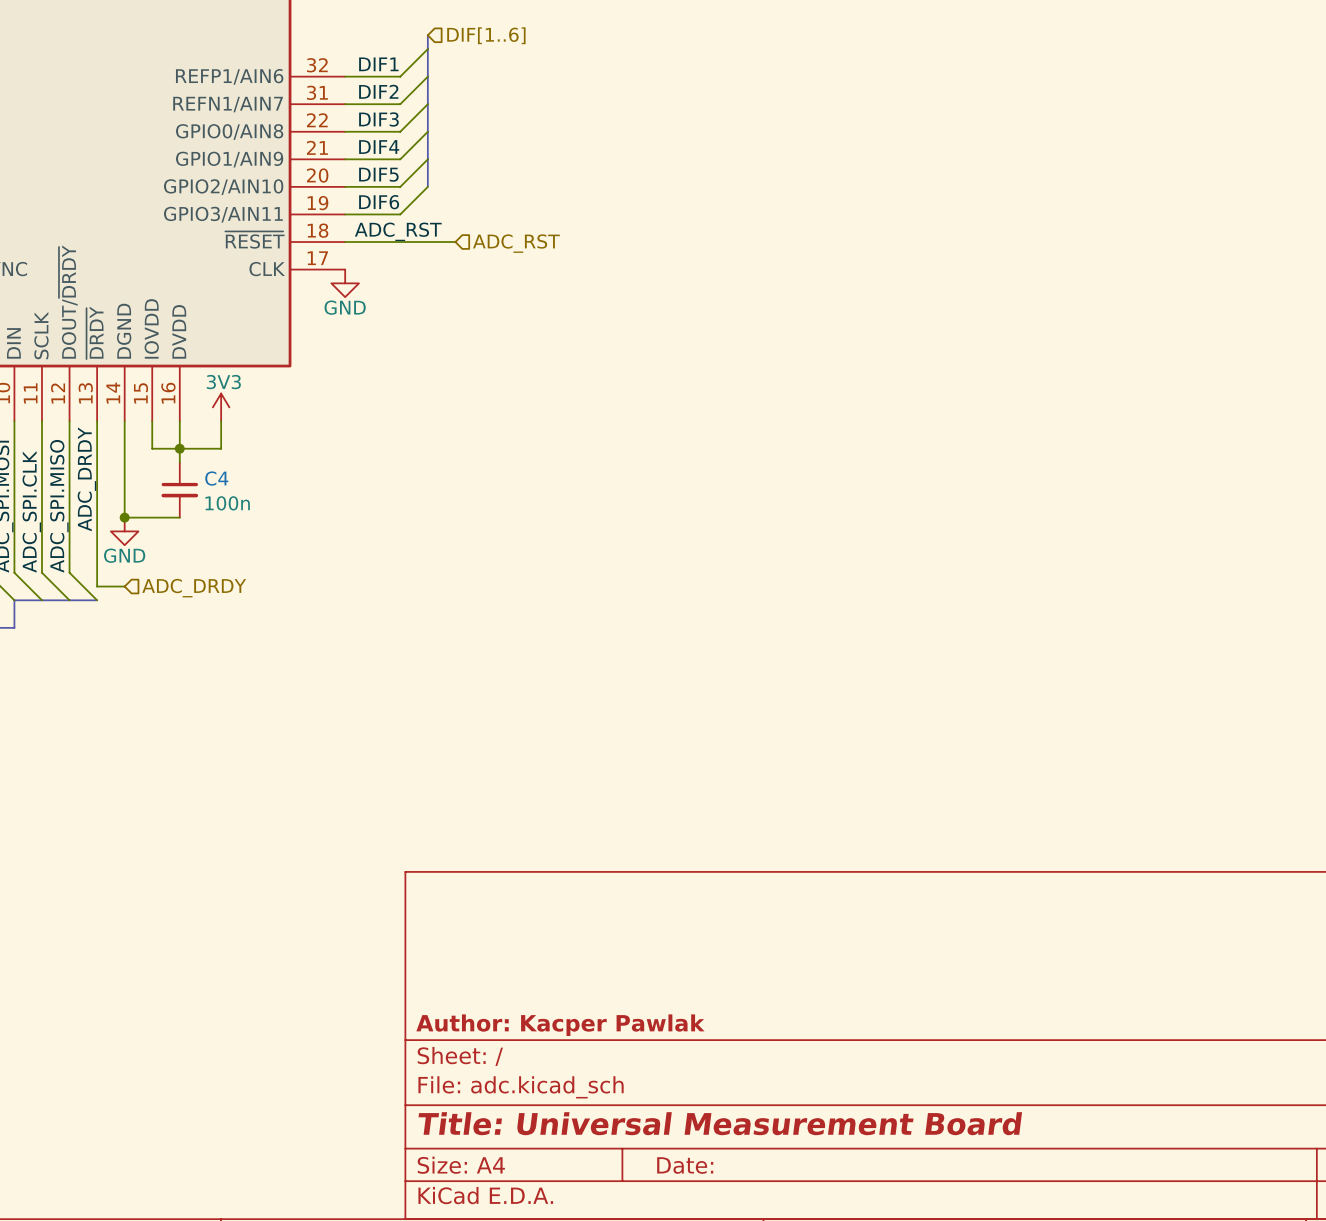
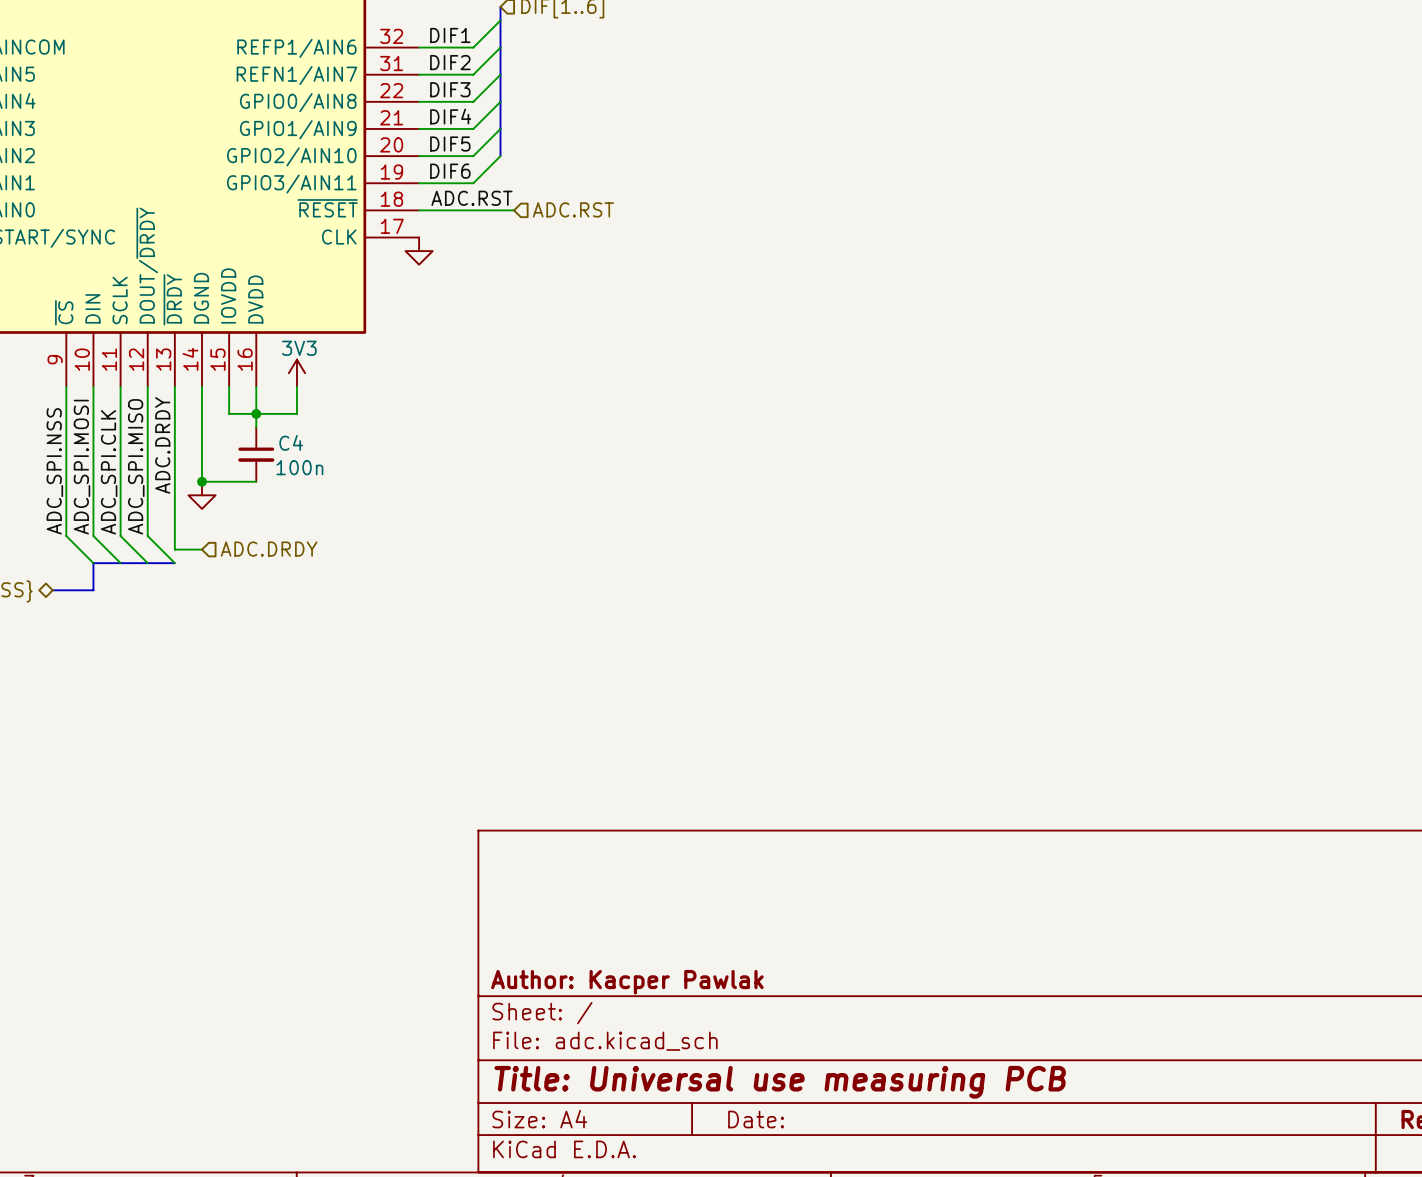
label: ADC_RST (398, 231) -> ADC.RST (471, 198)
wire: (441, 242) (455, 242) -> none
hierarchical label: ADC_RST (516, 243) -> ADC.RST (573, 209)
power symbol text: GND (345, 307) -> none
label: ADC_DRDY (86, 479) -> ADC.DRDY (162, 445)
power symbol text: GND (124, 555) -> none
hierarchical label: ADC_DRDY (194, 588) -> ADC.DRDY (269, 549)
title block: Title: Universal Measurement Board (720, 1123) -> Title: Universal use measuring PCB (780, 1082)

